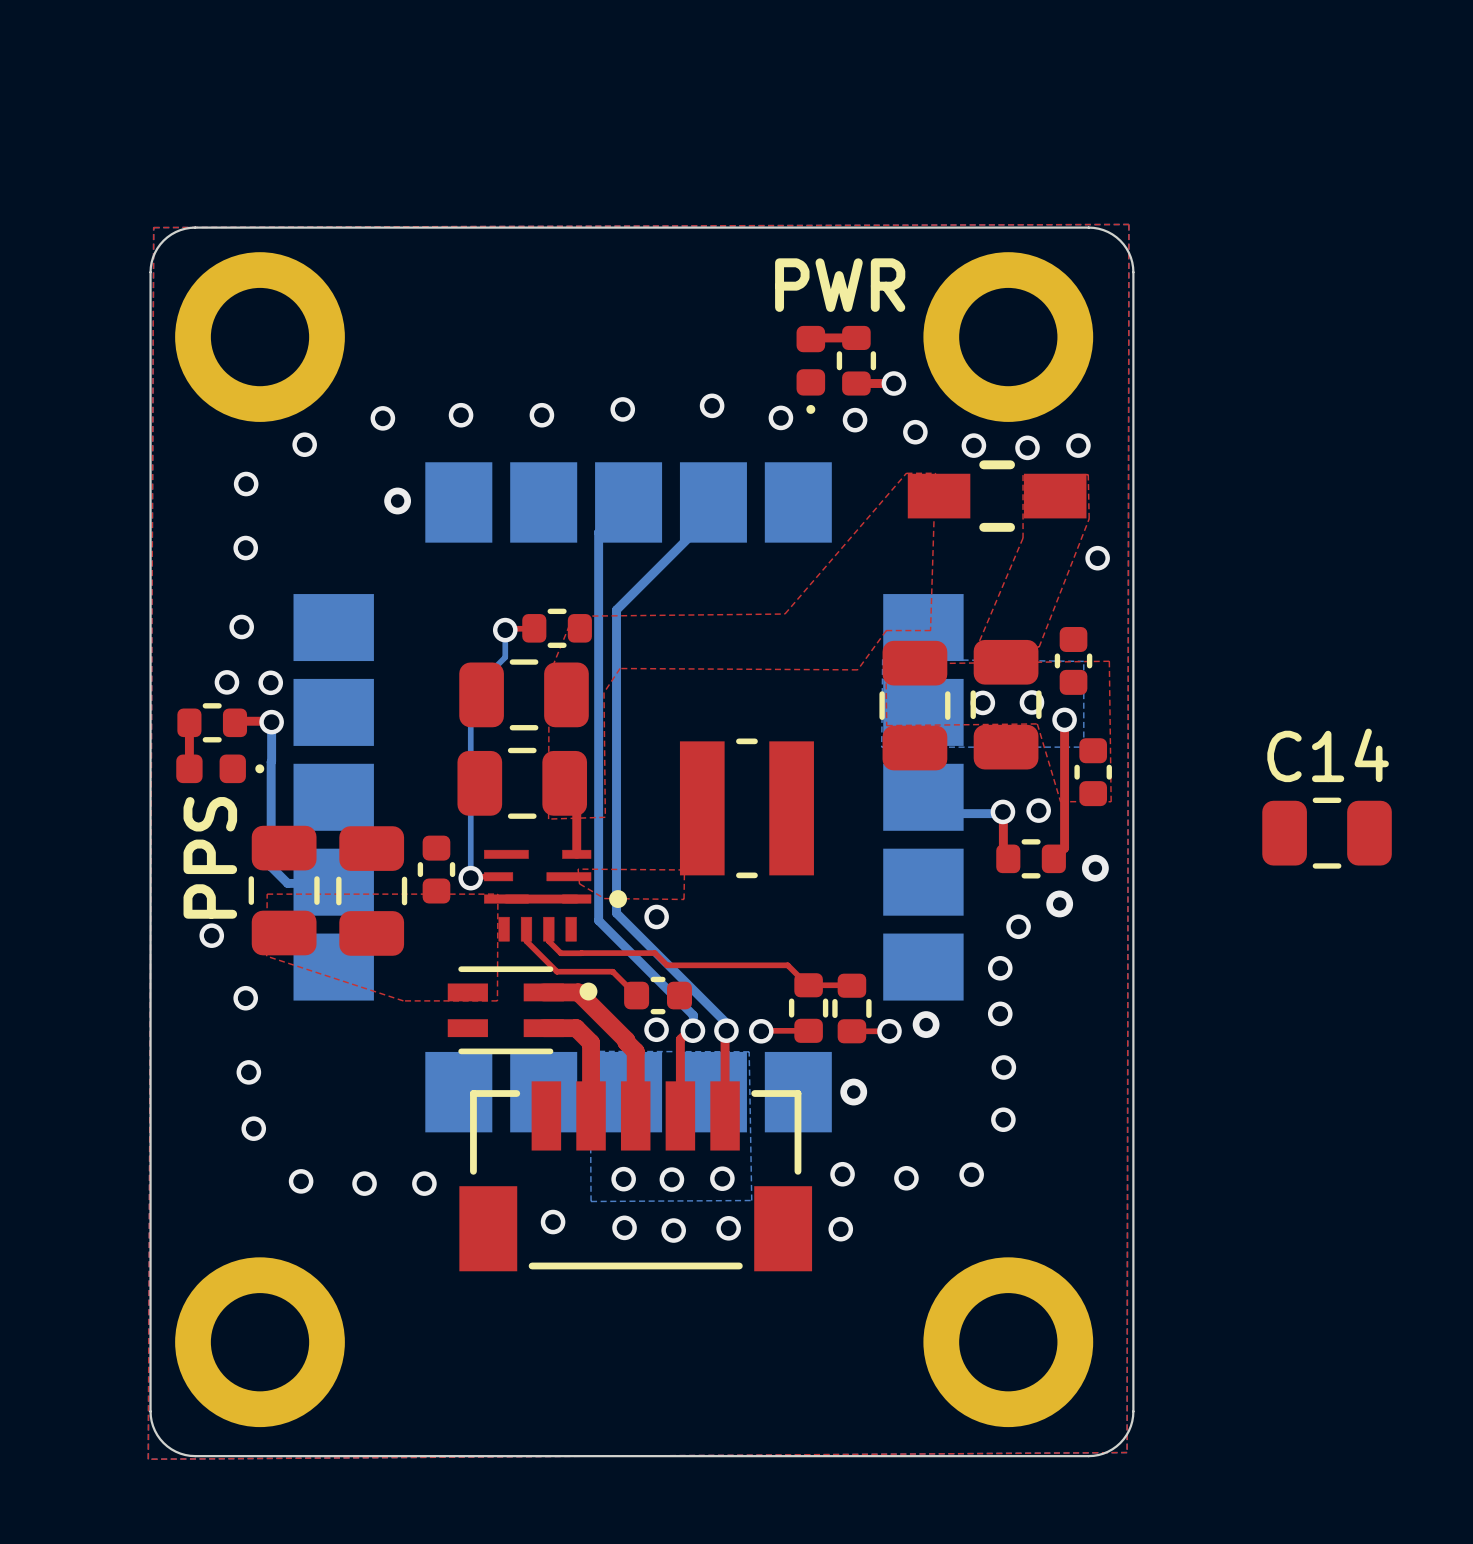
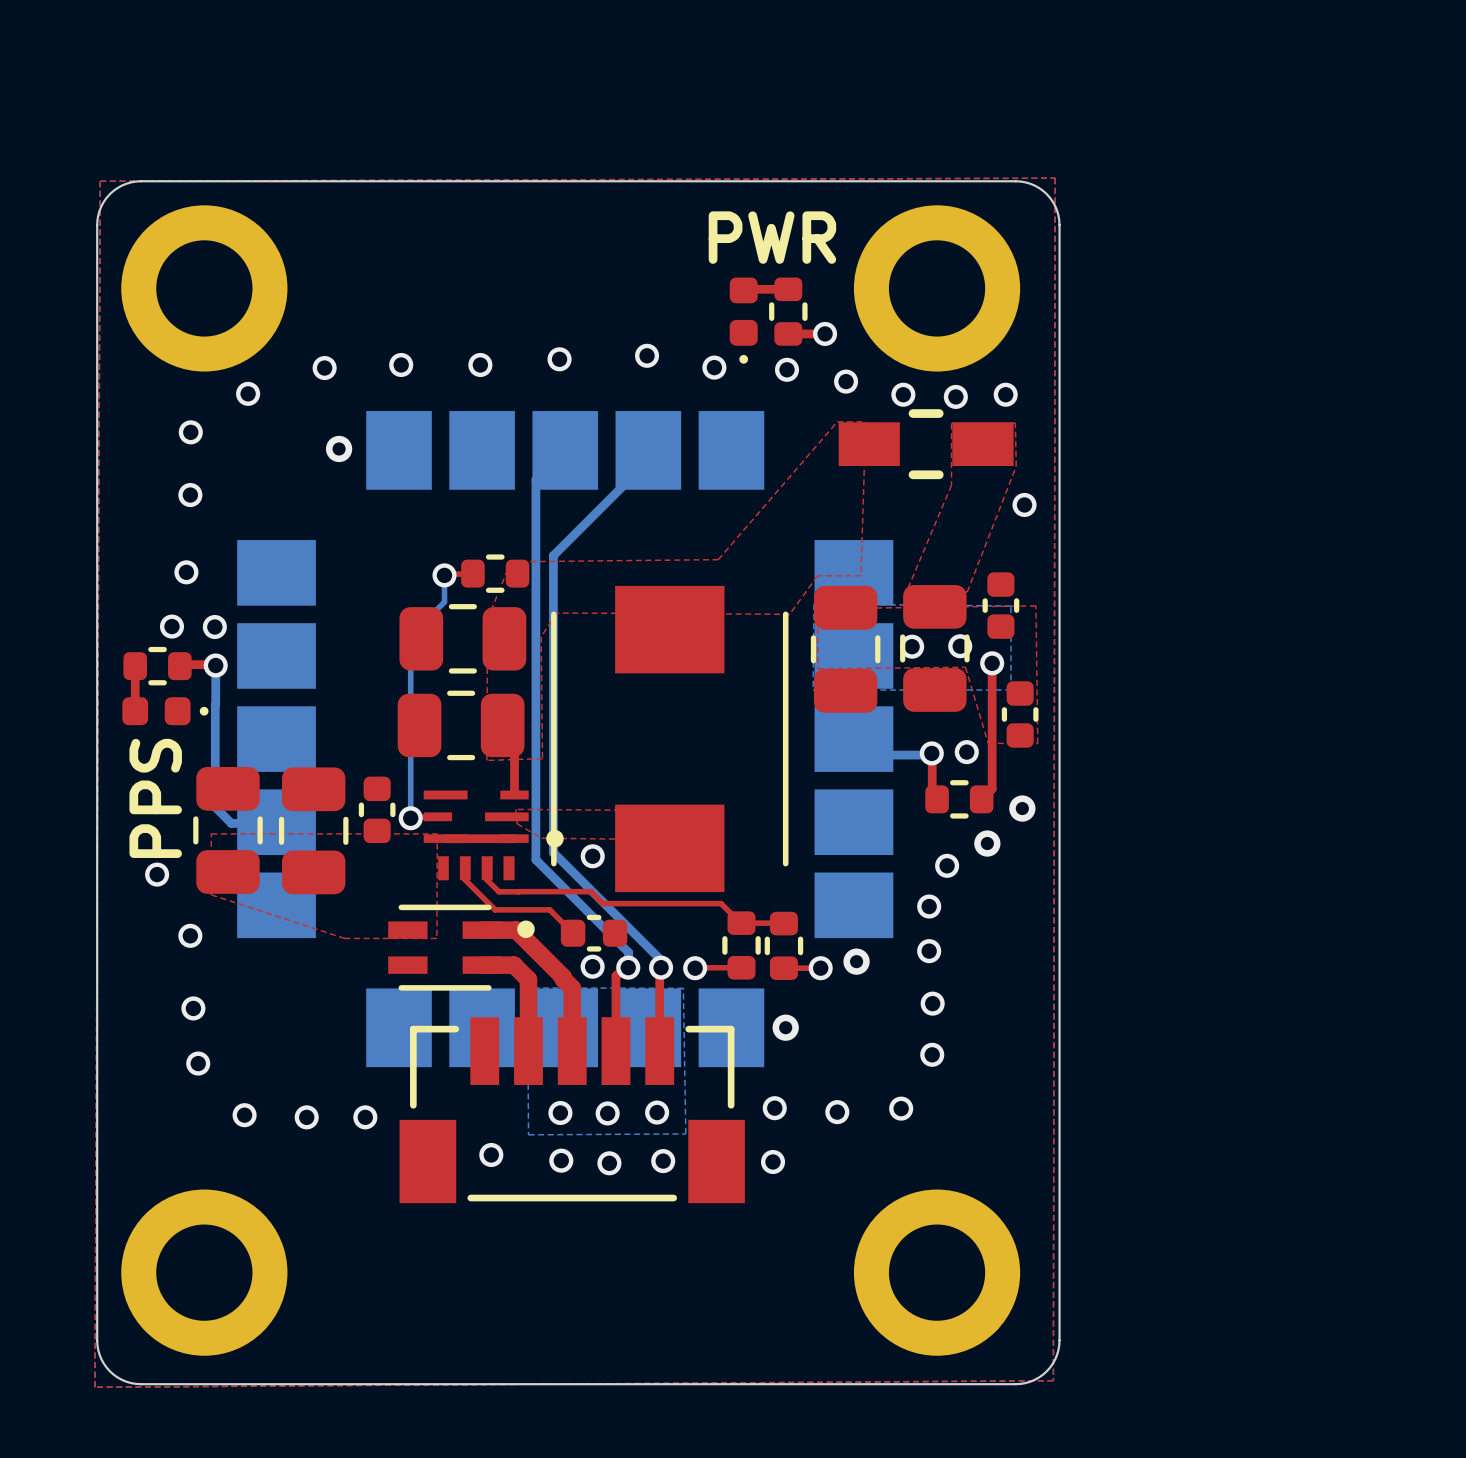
part footprint: [679, 738, 814, 879] -> [551, 585, 789, 893]
C14: (1327, 833) -> none

